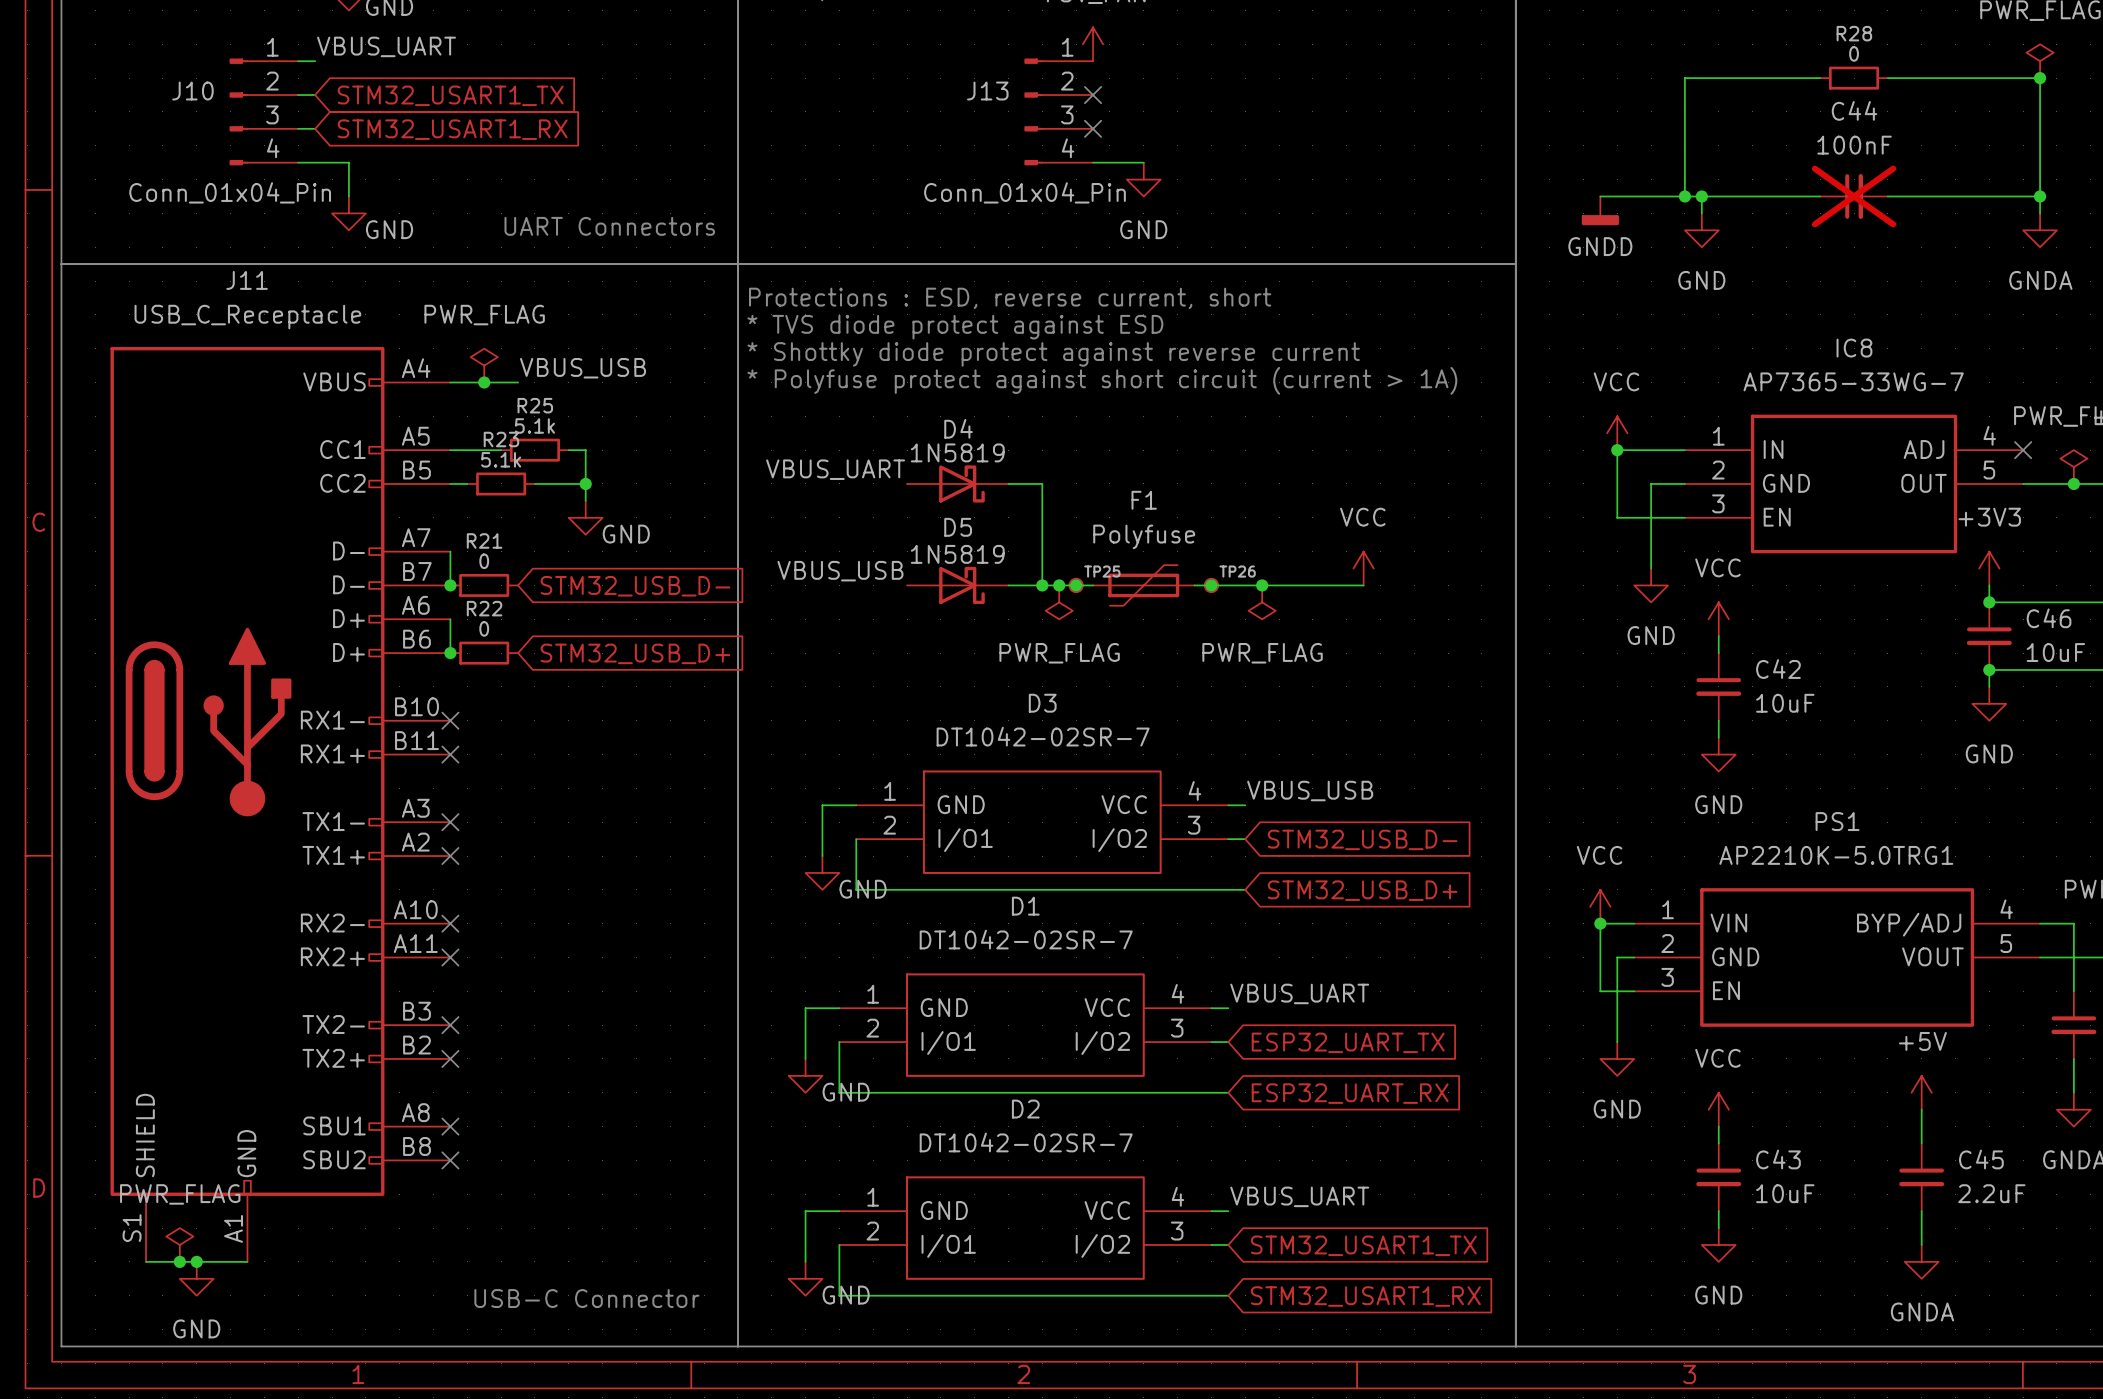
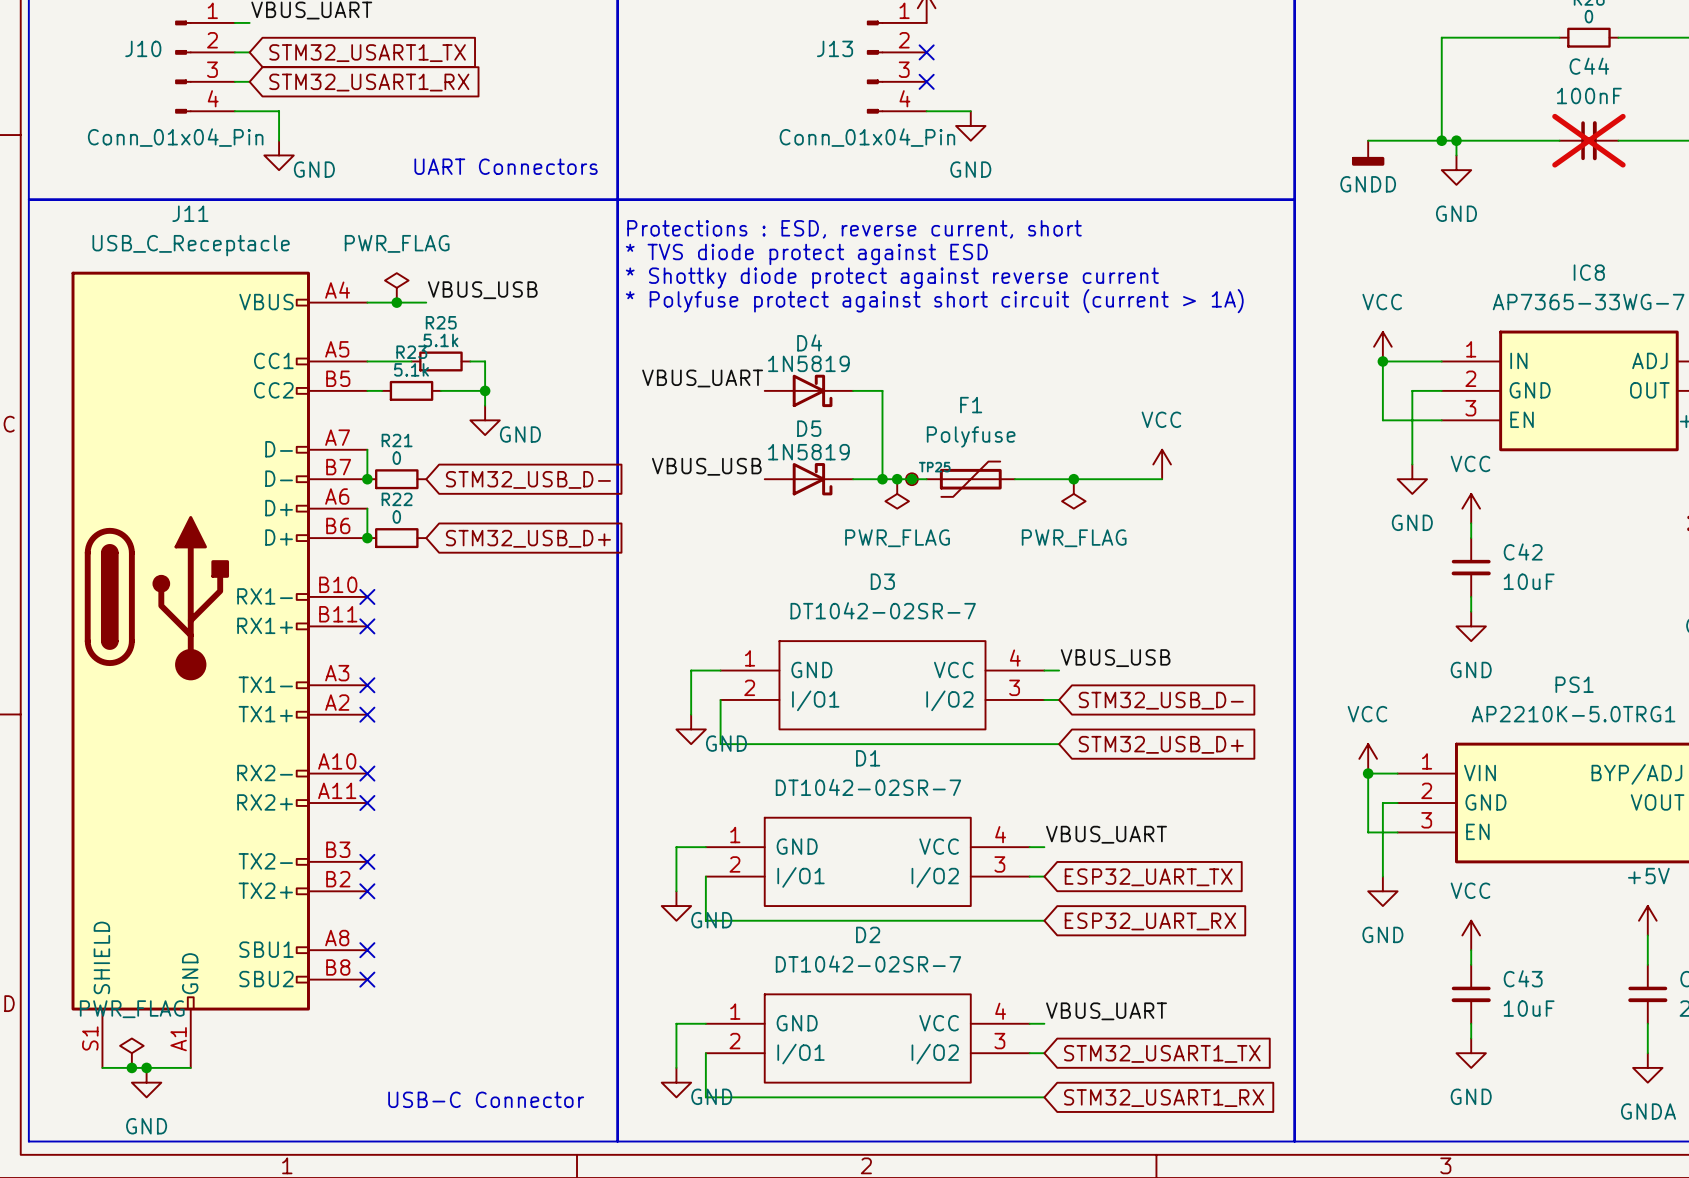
junction: (1211, 585) -> none
TP26: (1211, 585) -> none

